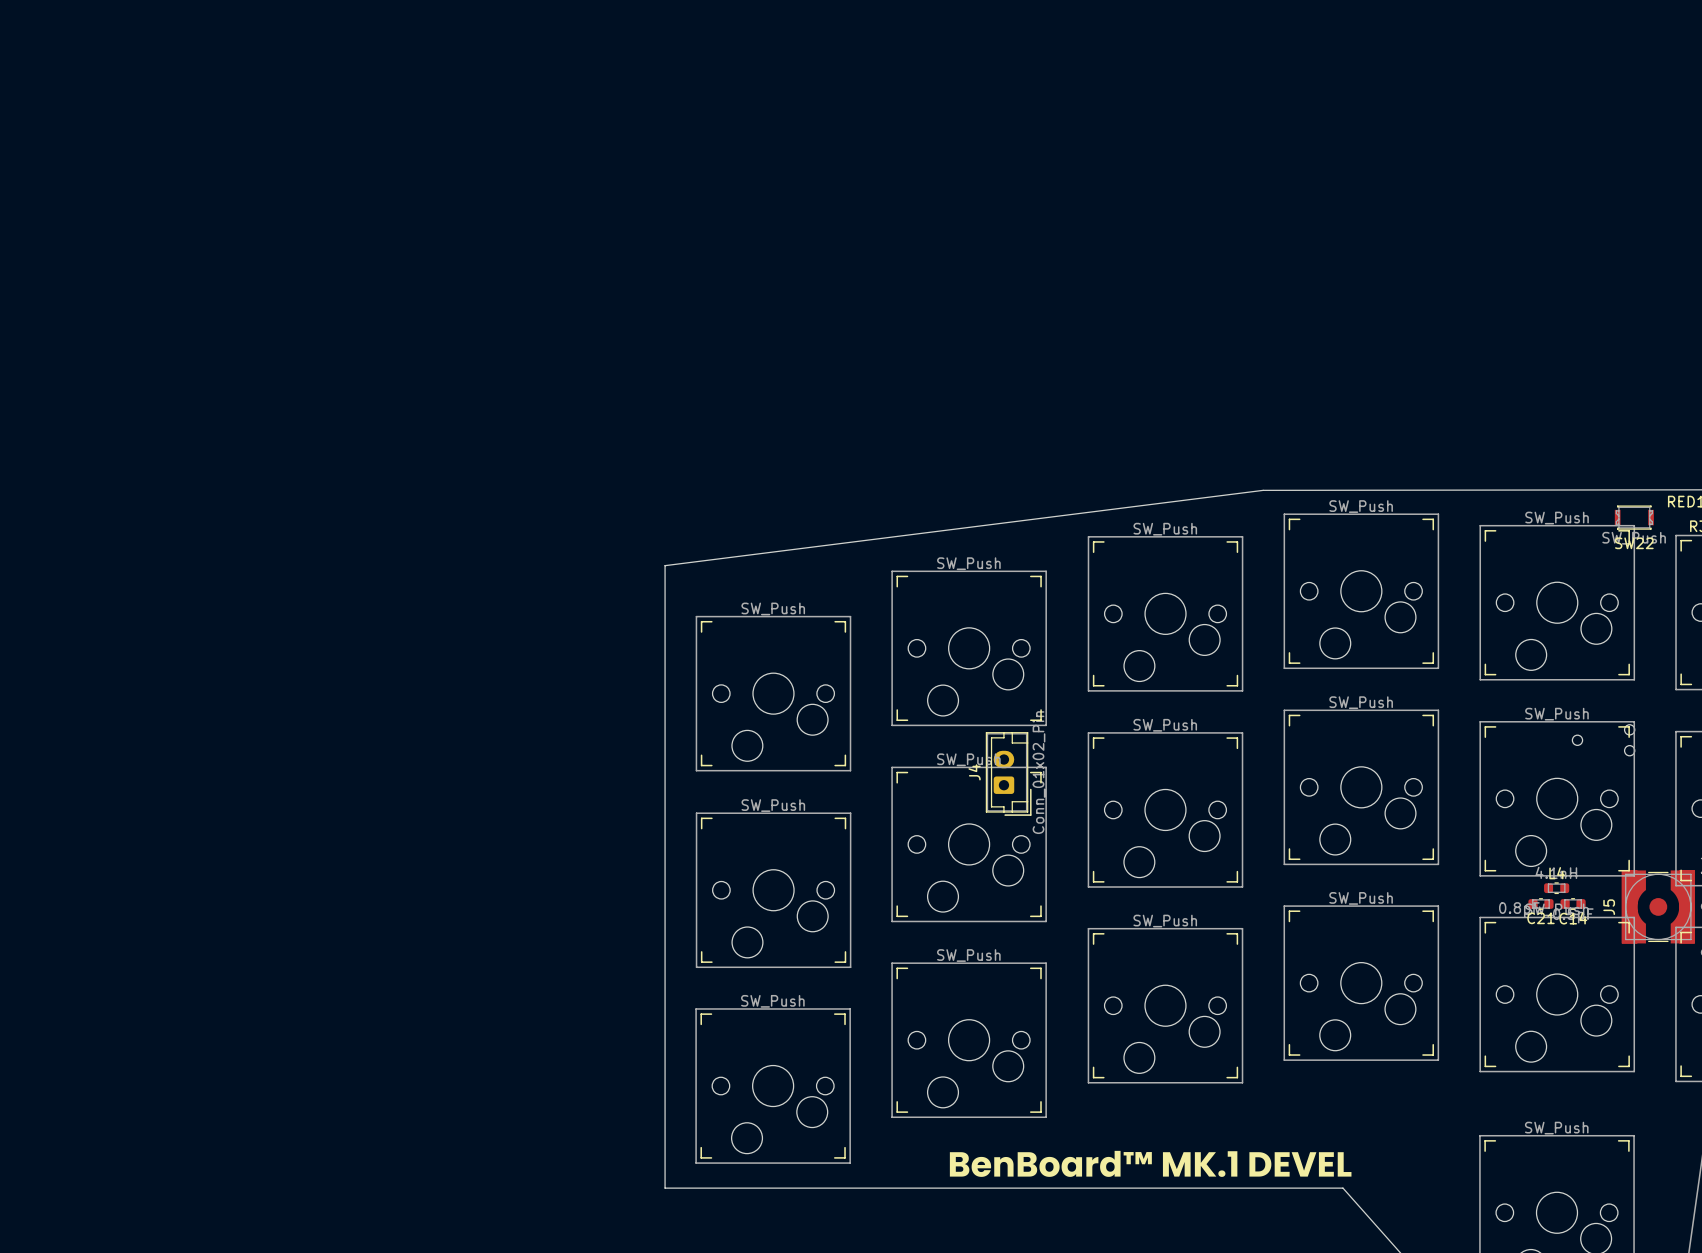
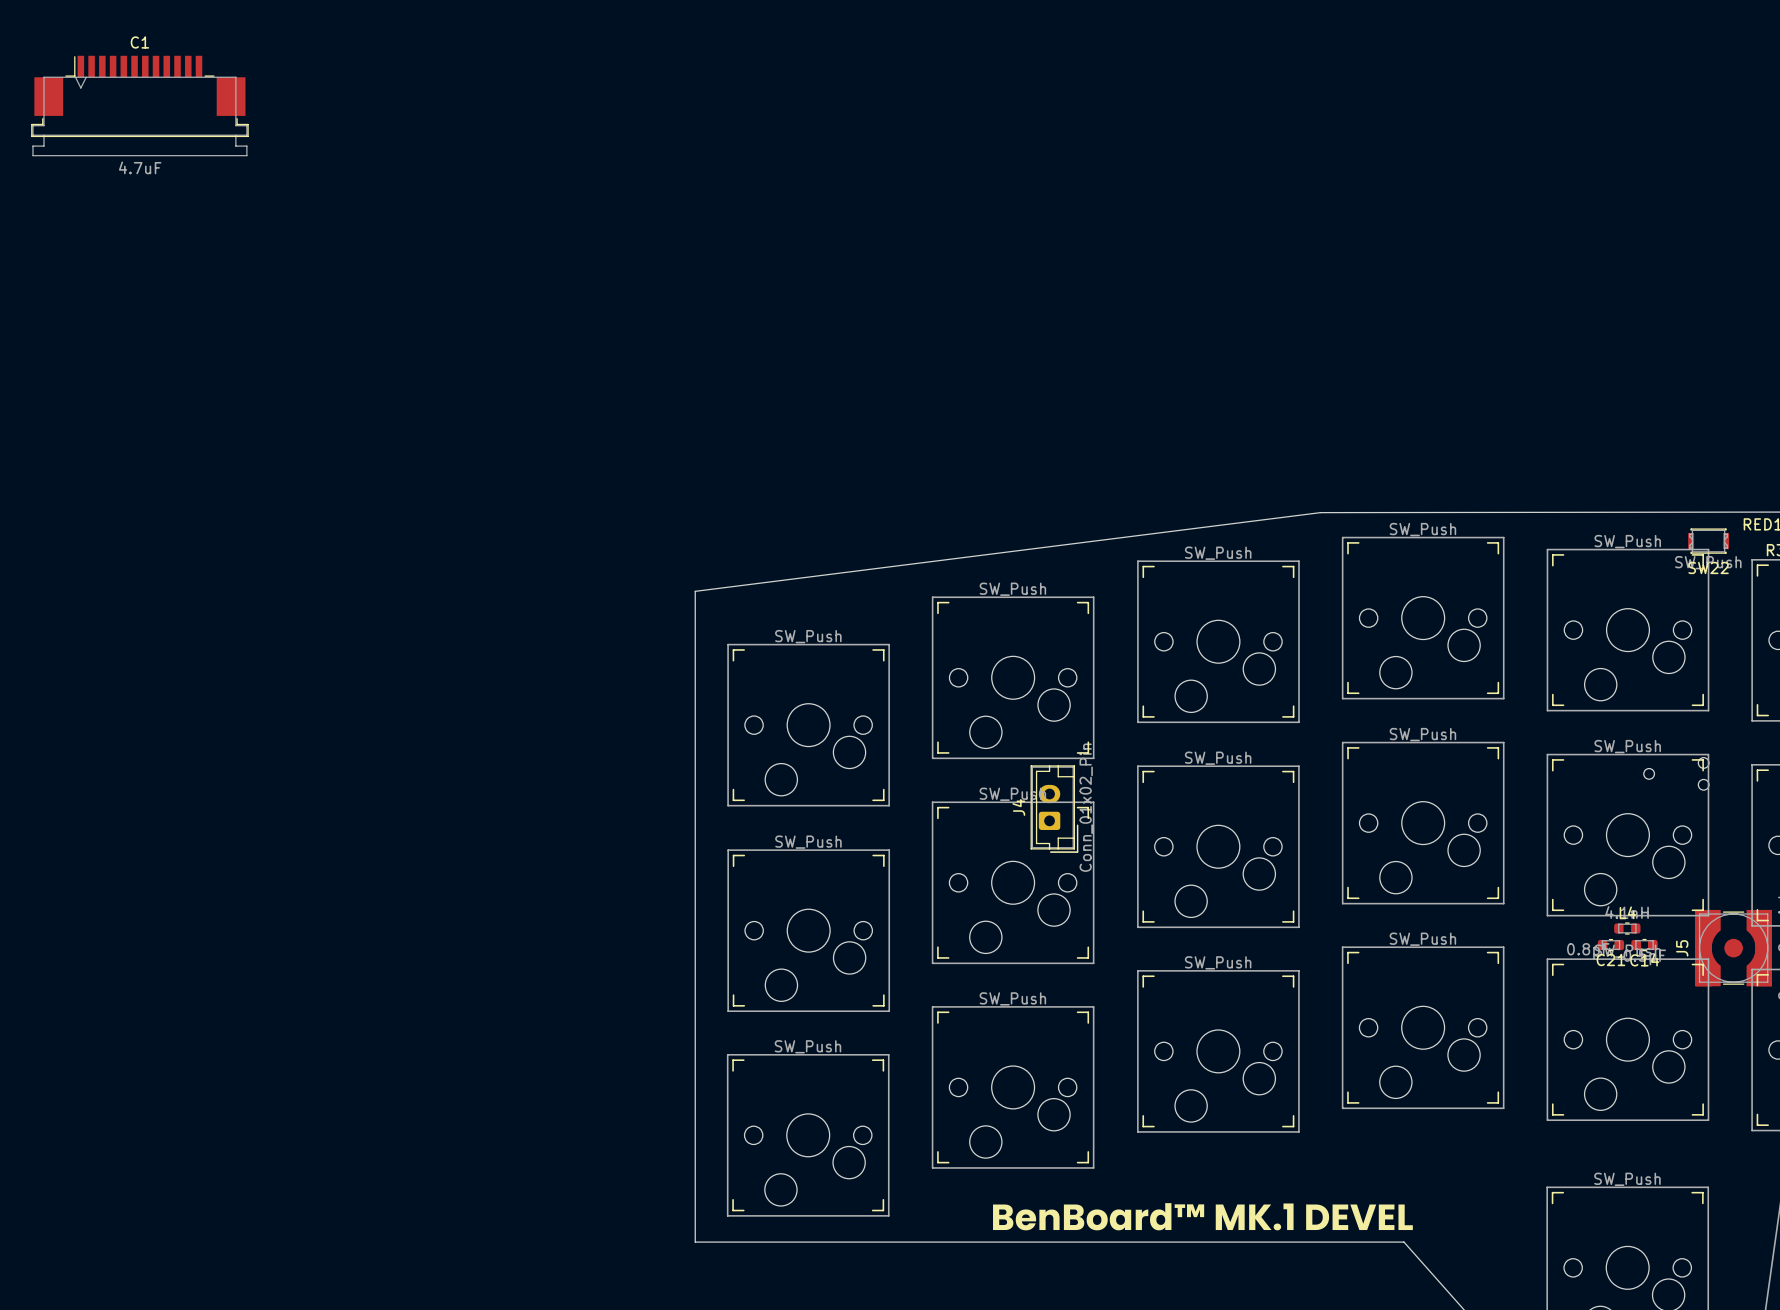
C1: none -> 4.7uF (139, 105)

